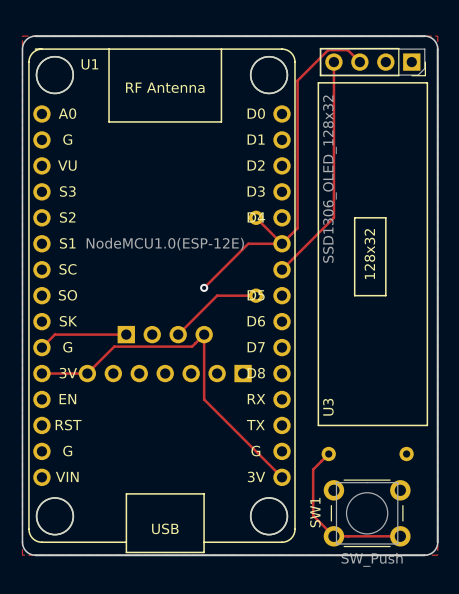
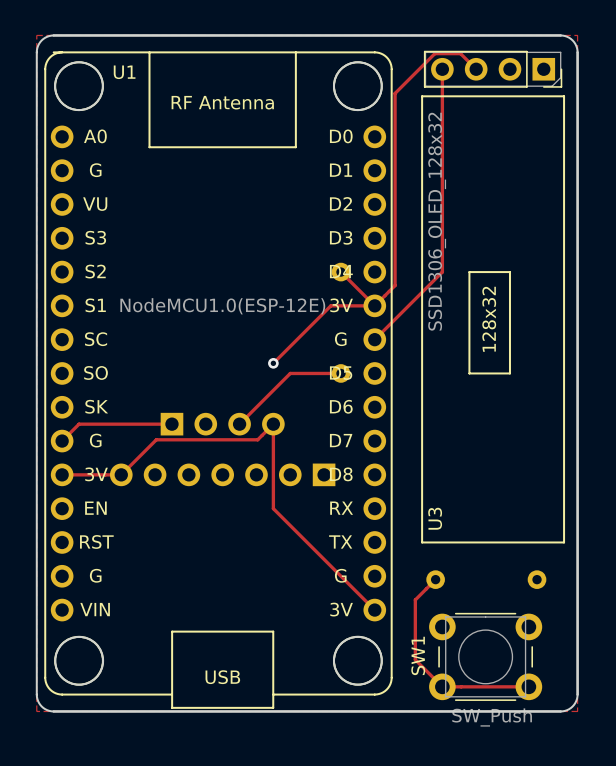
U1 text: none -> 3V (341, 305)
U1 text: none -> G (340, 339)

